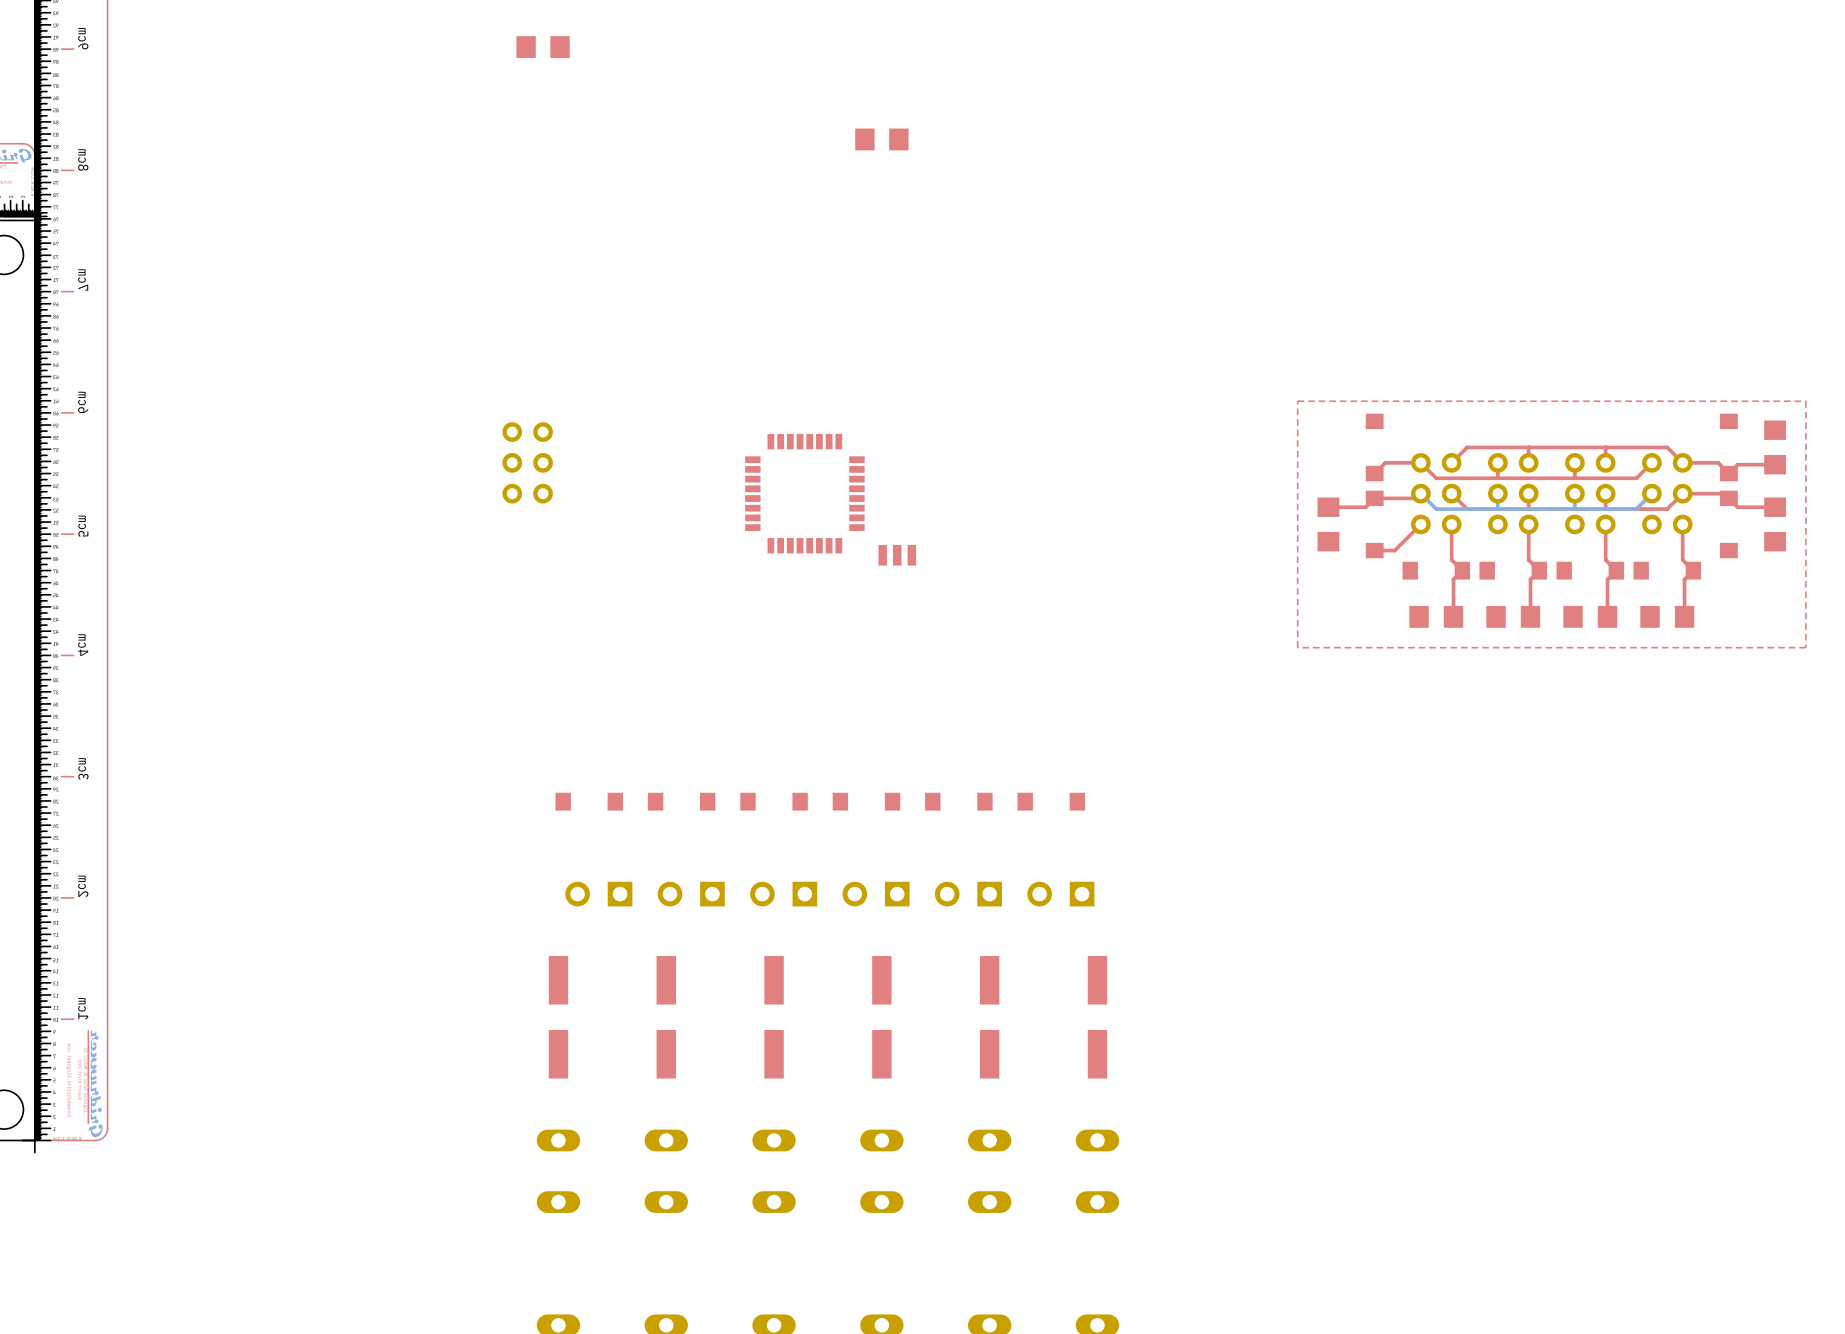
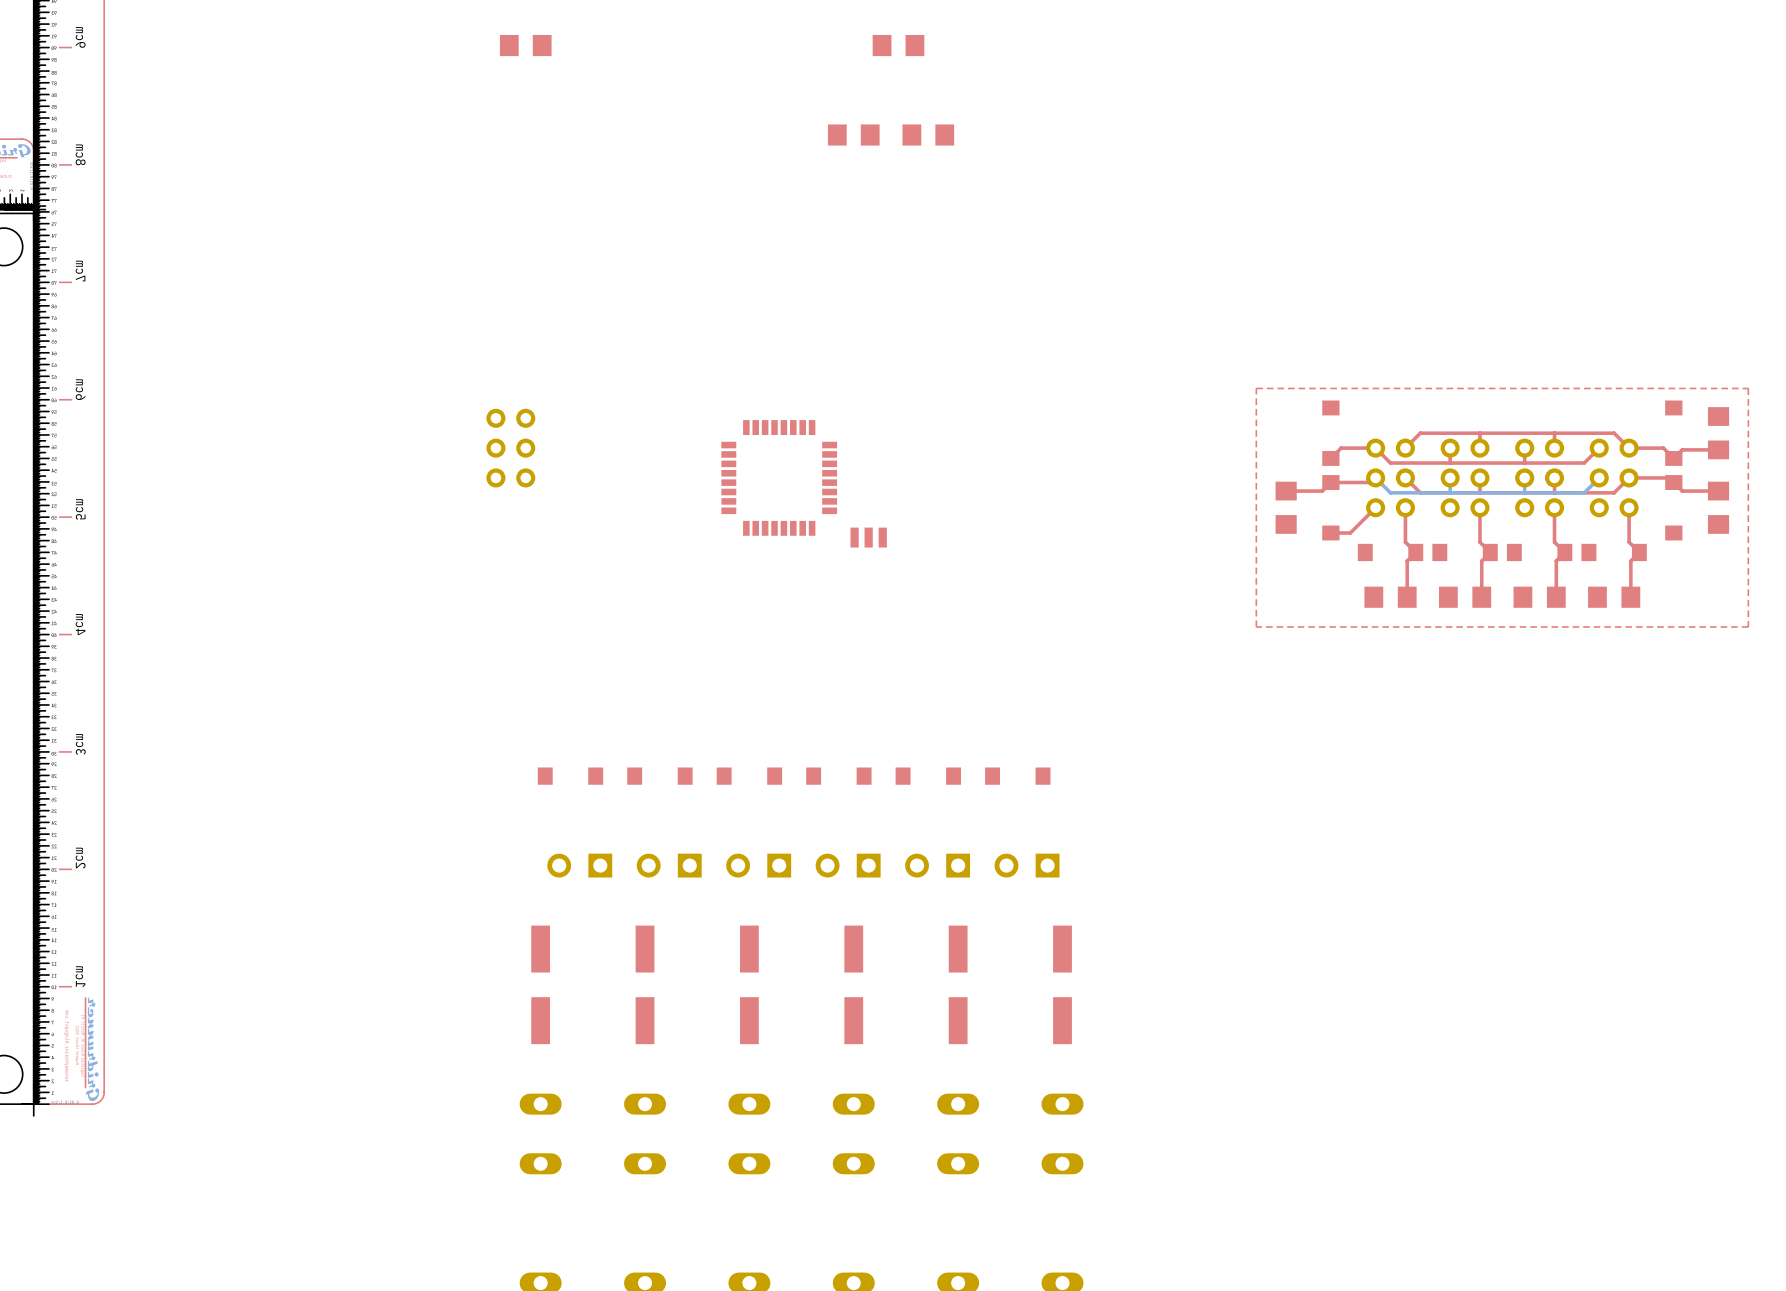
part: none -> (898, 45)
part: none -> (928, 135)

